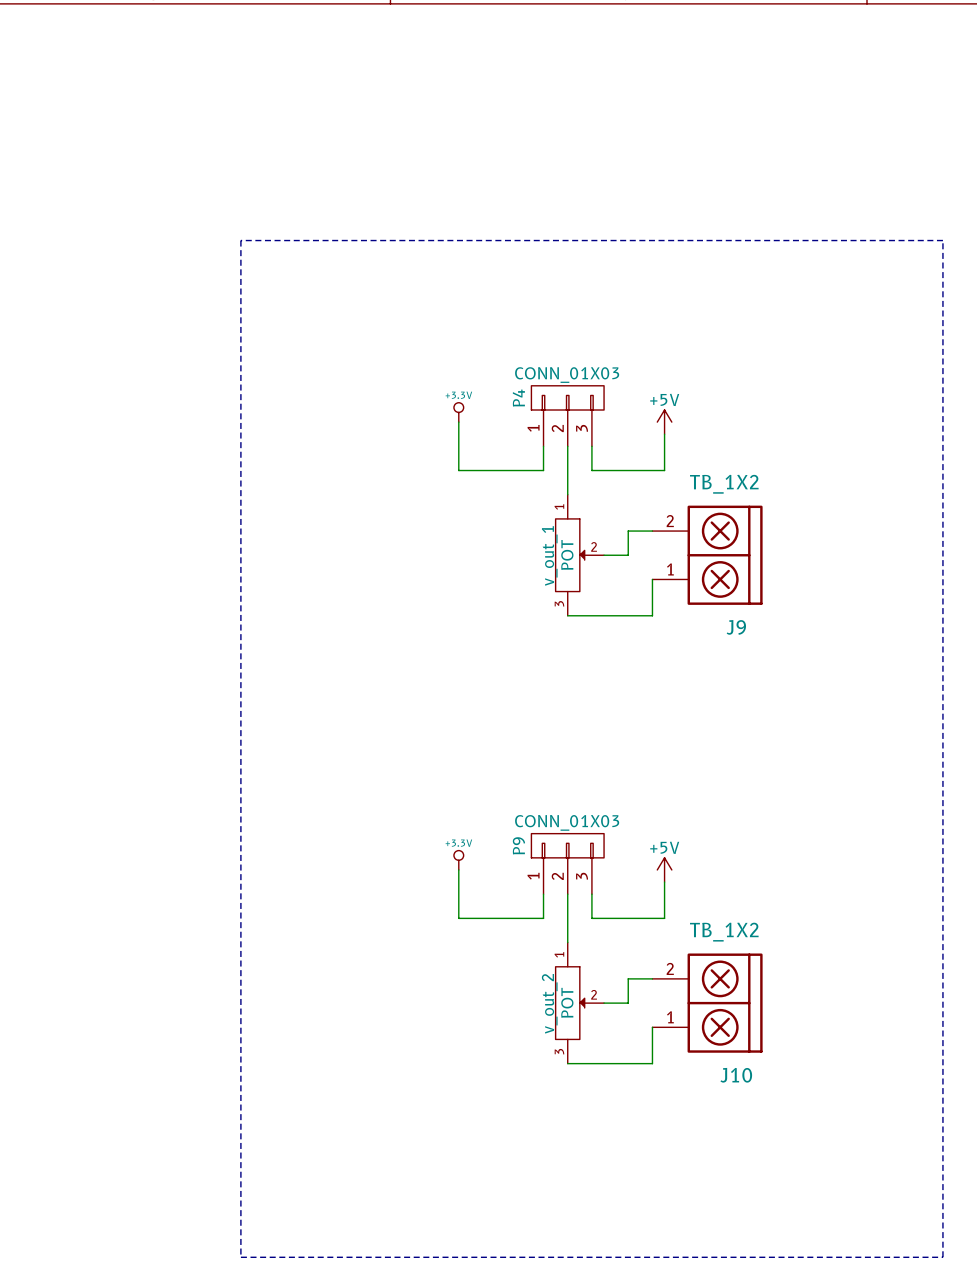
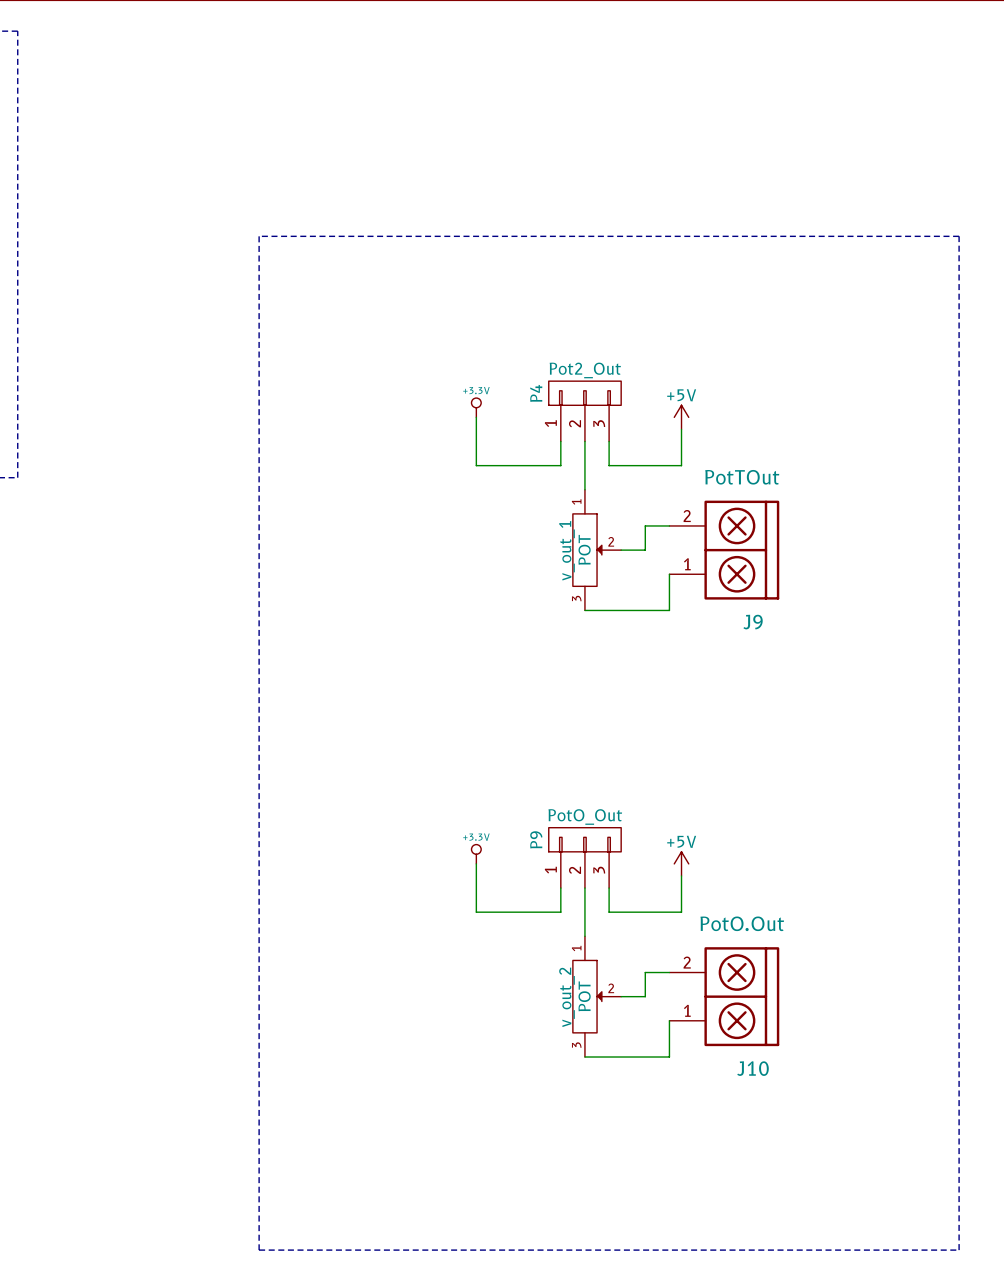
P4 value: CONN_01X03 (567, 375) -> Pot2_Out (585, 370)
J9 value: TB_1X2 (724, 484) -> PotTOut (742, 477)
P9 value: CONN_01X03 (567, 822) -> PotO_Out (585, 816)
J10 value: TB_1X2 (724, 932) -> PotO.Out (742, 923)

